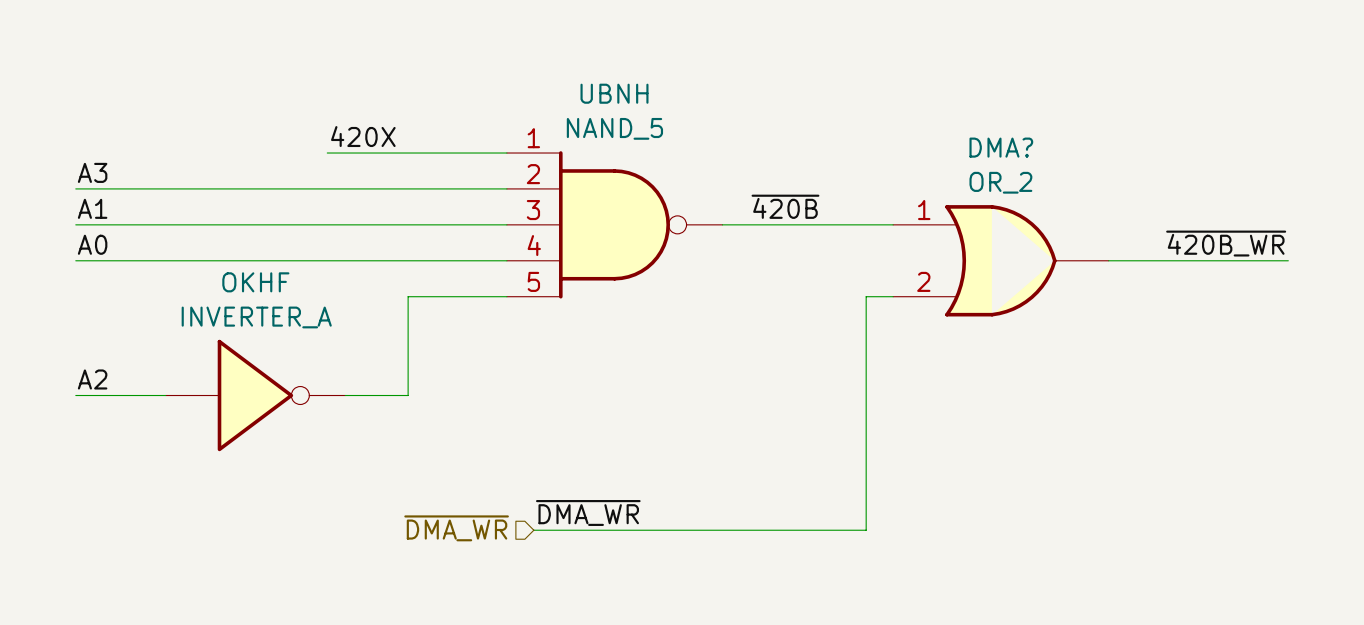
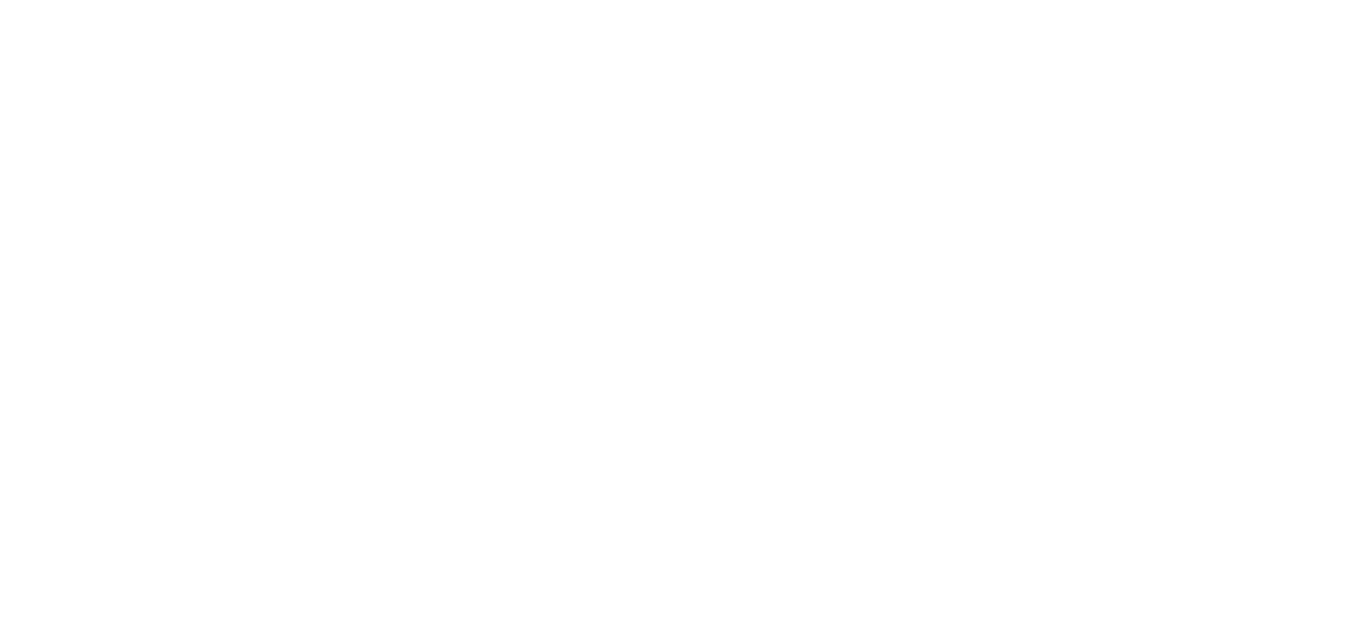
label: 420X (363, 136) -> none
wire: (327, 153) (506, 153) -> none
label: A3 (92, 172) -> none
wire: (75, 188) (506, 188) -> none
label: ~{420B} (785, 206) -> none
label: A1 (92, 208) -> none
wire: (75, 224) (506, 224) -> none
UBNH: NAND_5 (614, 224) -> none
wire: (722, 224) (893, 224) -> none
label: ~{420B_WR} (1226, 243) -> none
label: A0 (92, 244) -> none
wire: (75, 260) (506, 260) -> none
DMA?: OR_2 (1000, 260) -> none
wire: (1108, 260) (1288, 260) -> none
wire: (506, 296) (408, 296) (408, 395) (345, 395) -> none
wire: (893, 296) (866, 296) (866, 530) (533, 530) -> none
label: A2 (92, 379) -> none
wire: (75, 395) (165, 395) -> none
OKHF: INVERTER_A (255, 395) -> none
label: ~{DMA_WR} (588, 512) -> none
hierarchical label: ~{DMA_WR} (456, 528) -> none

